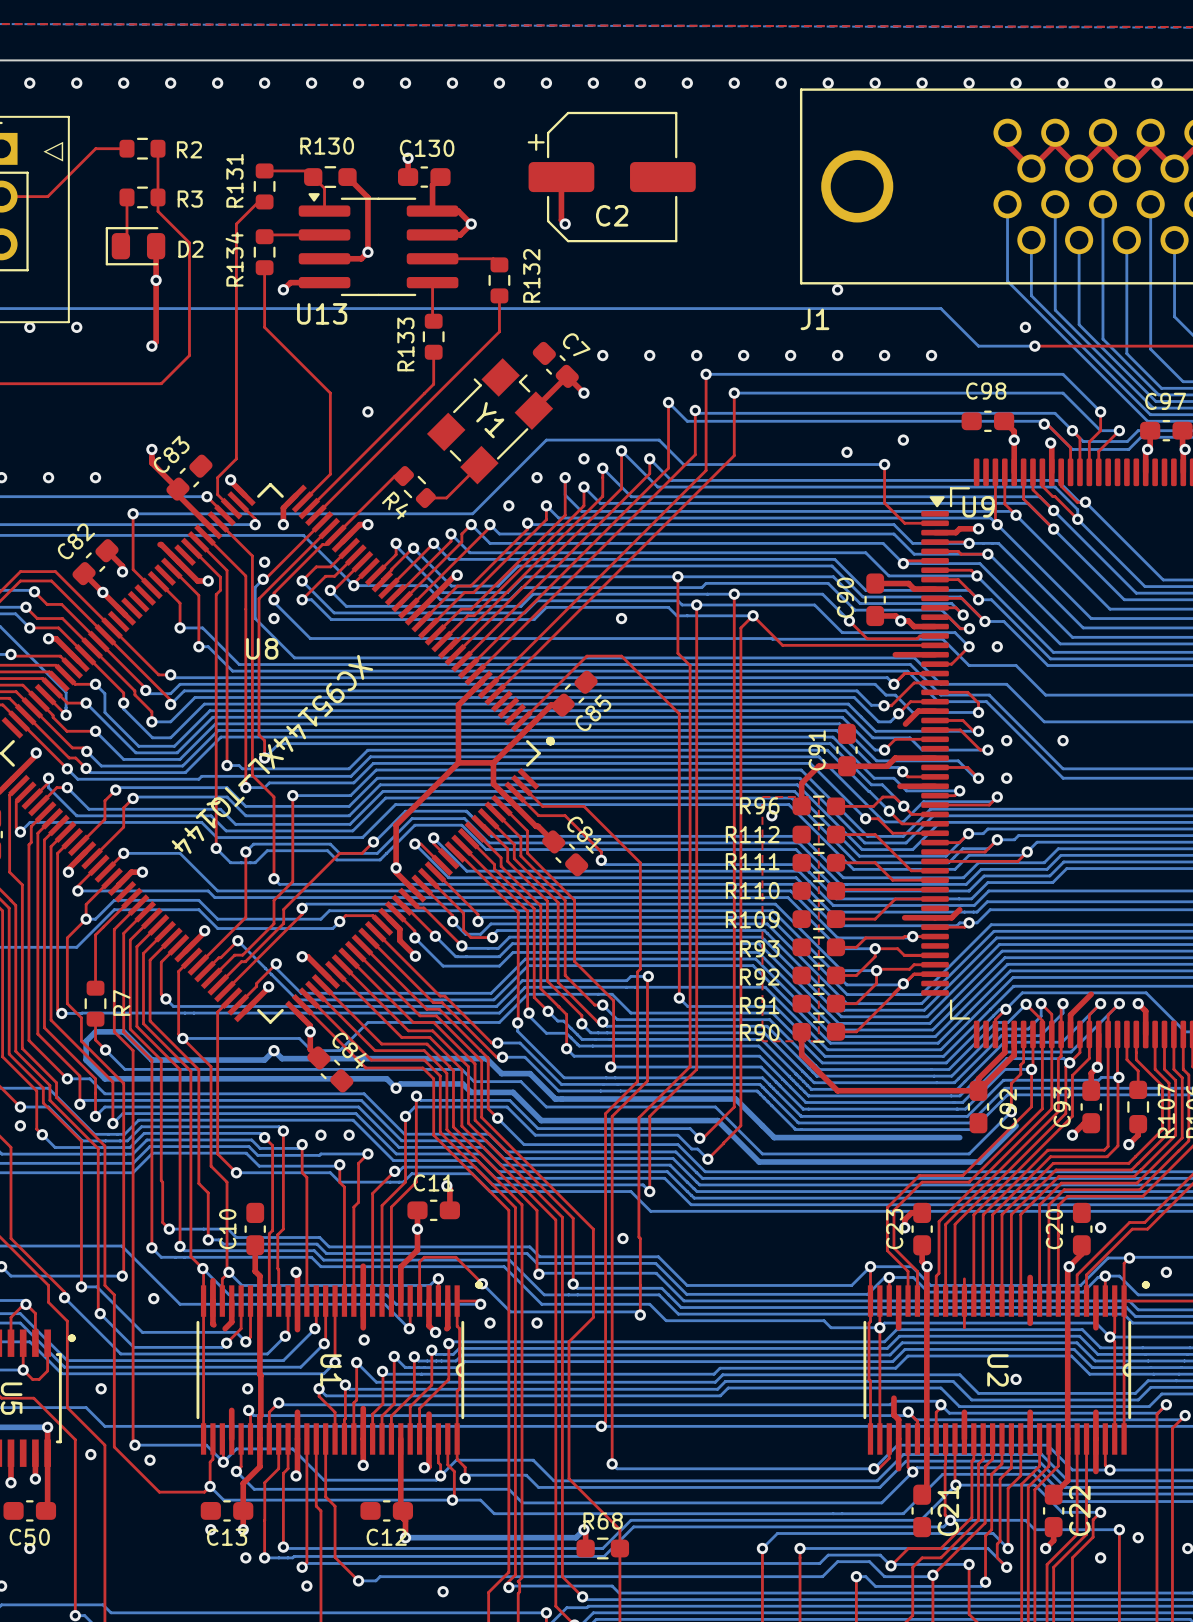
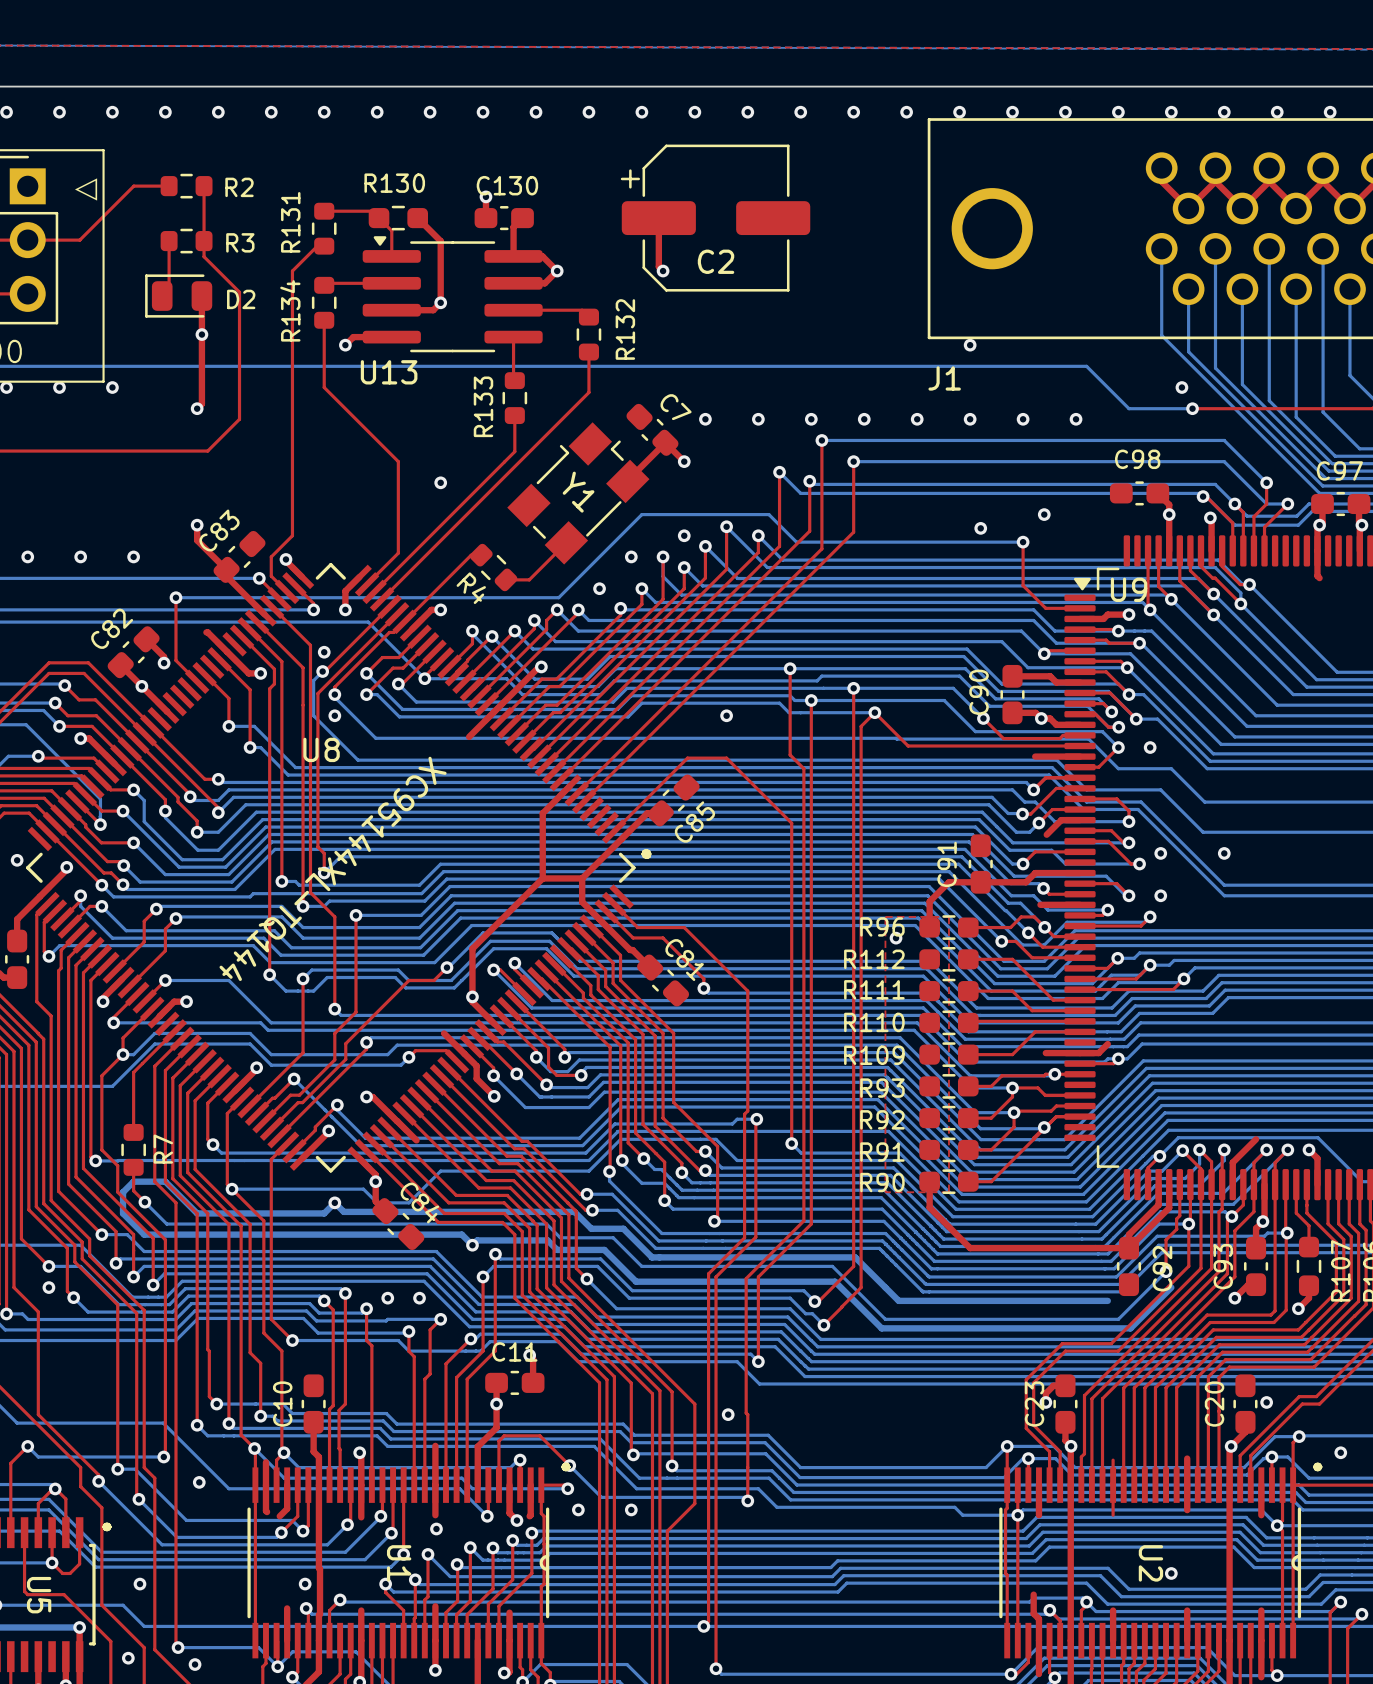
top track: none -> (1317, 550) (1317, 575) (1319, 578)
top track: none -> (494, 711) (469, 736)
top track: none -> (444, 1033) (464, 1053)
top track: none -> (397, 1121) (416, 1140)

